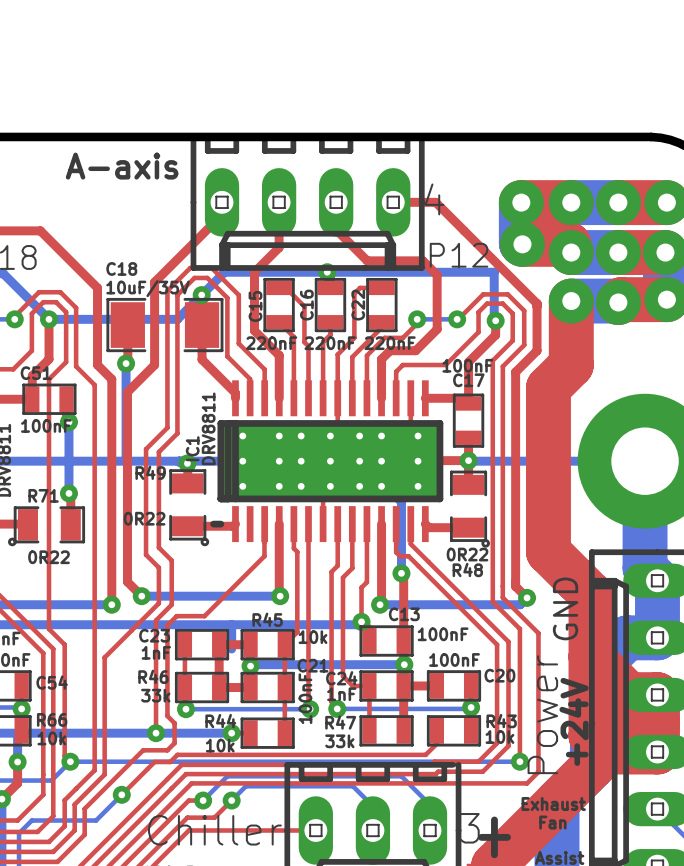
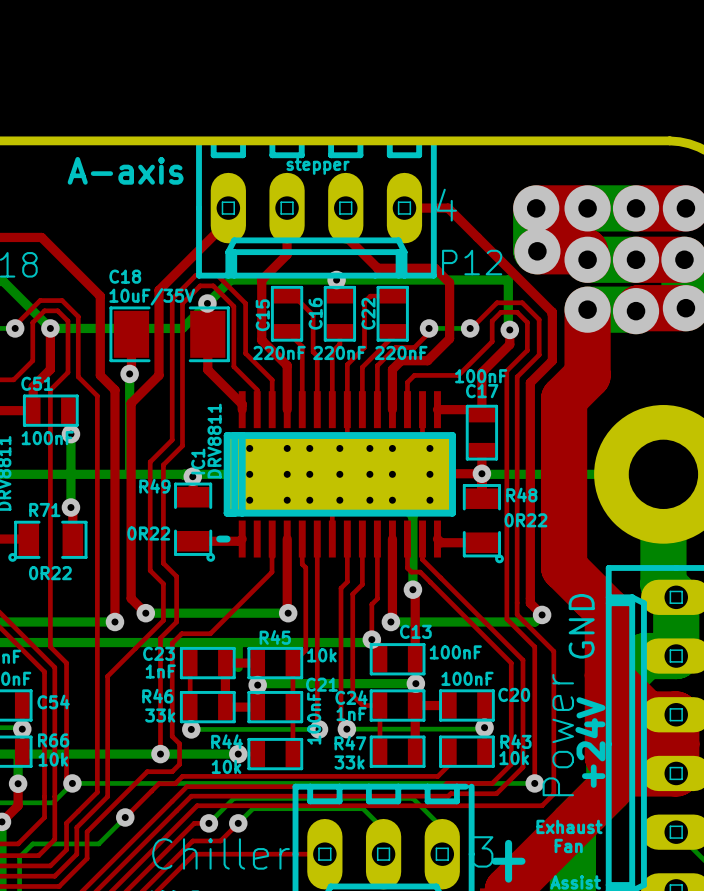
P12 value: none -> stepper (318, 165)
R48 value position: 0R22 (467, 554) -> 0R22 (525, 520)
R48 name position: R48 (467, 569) -> R48 (521, 495)

